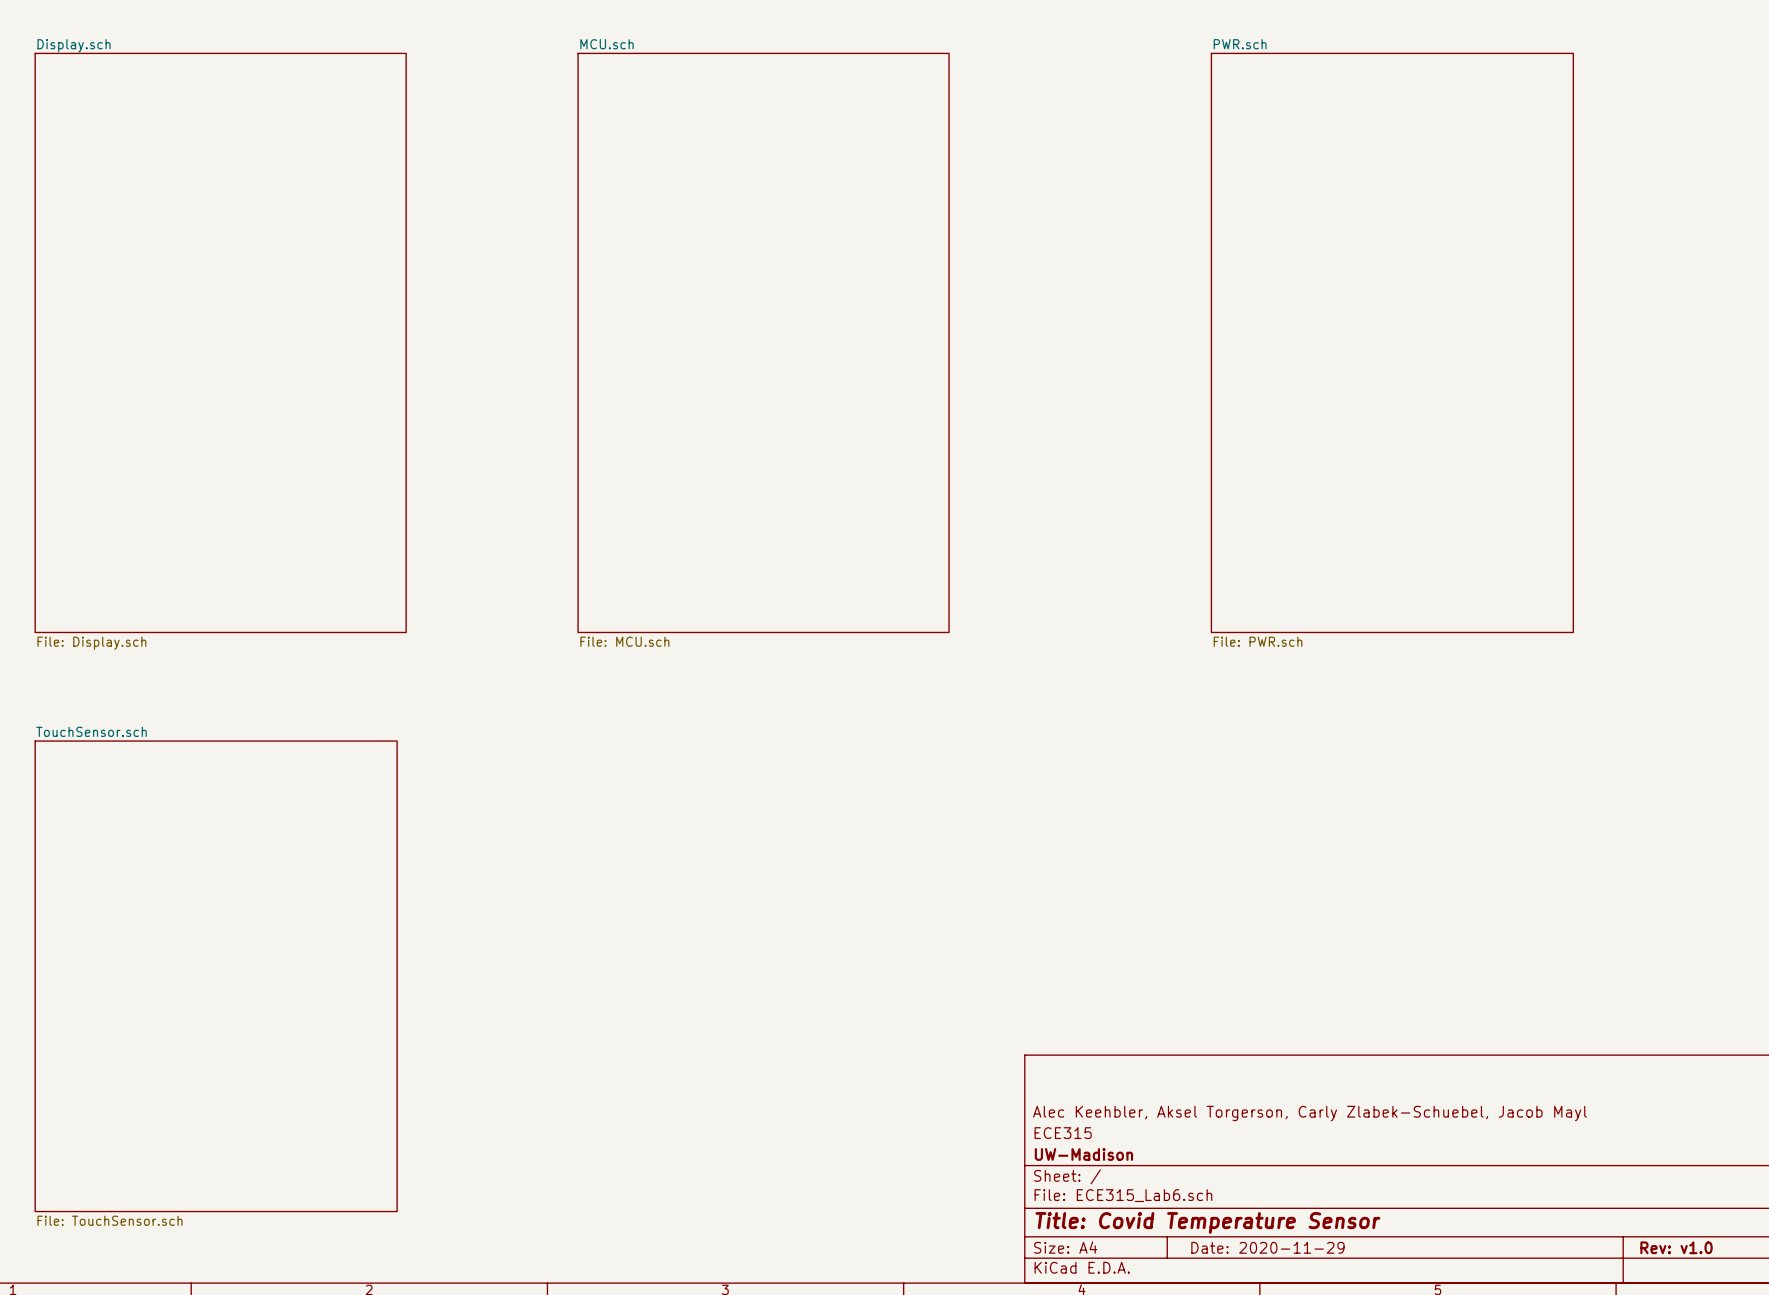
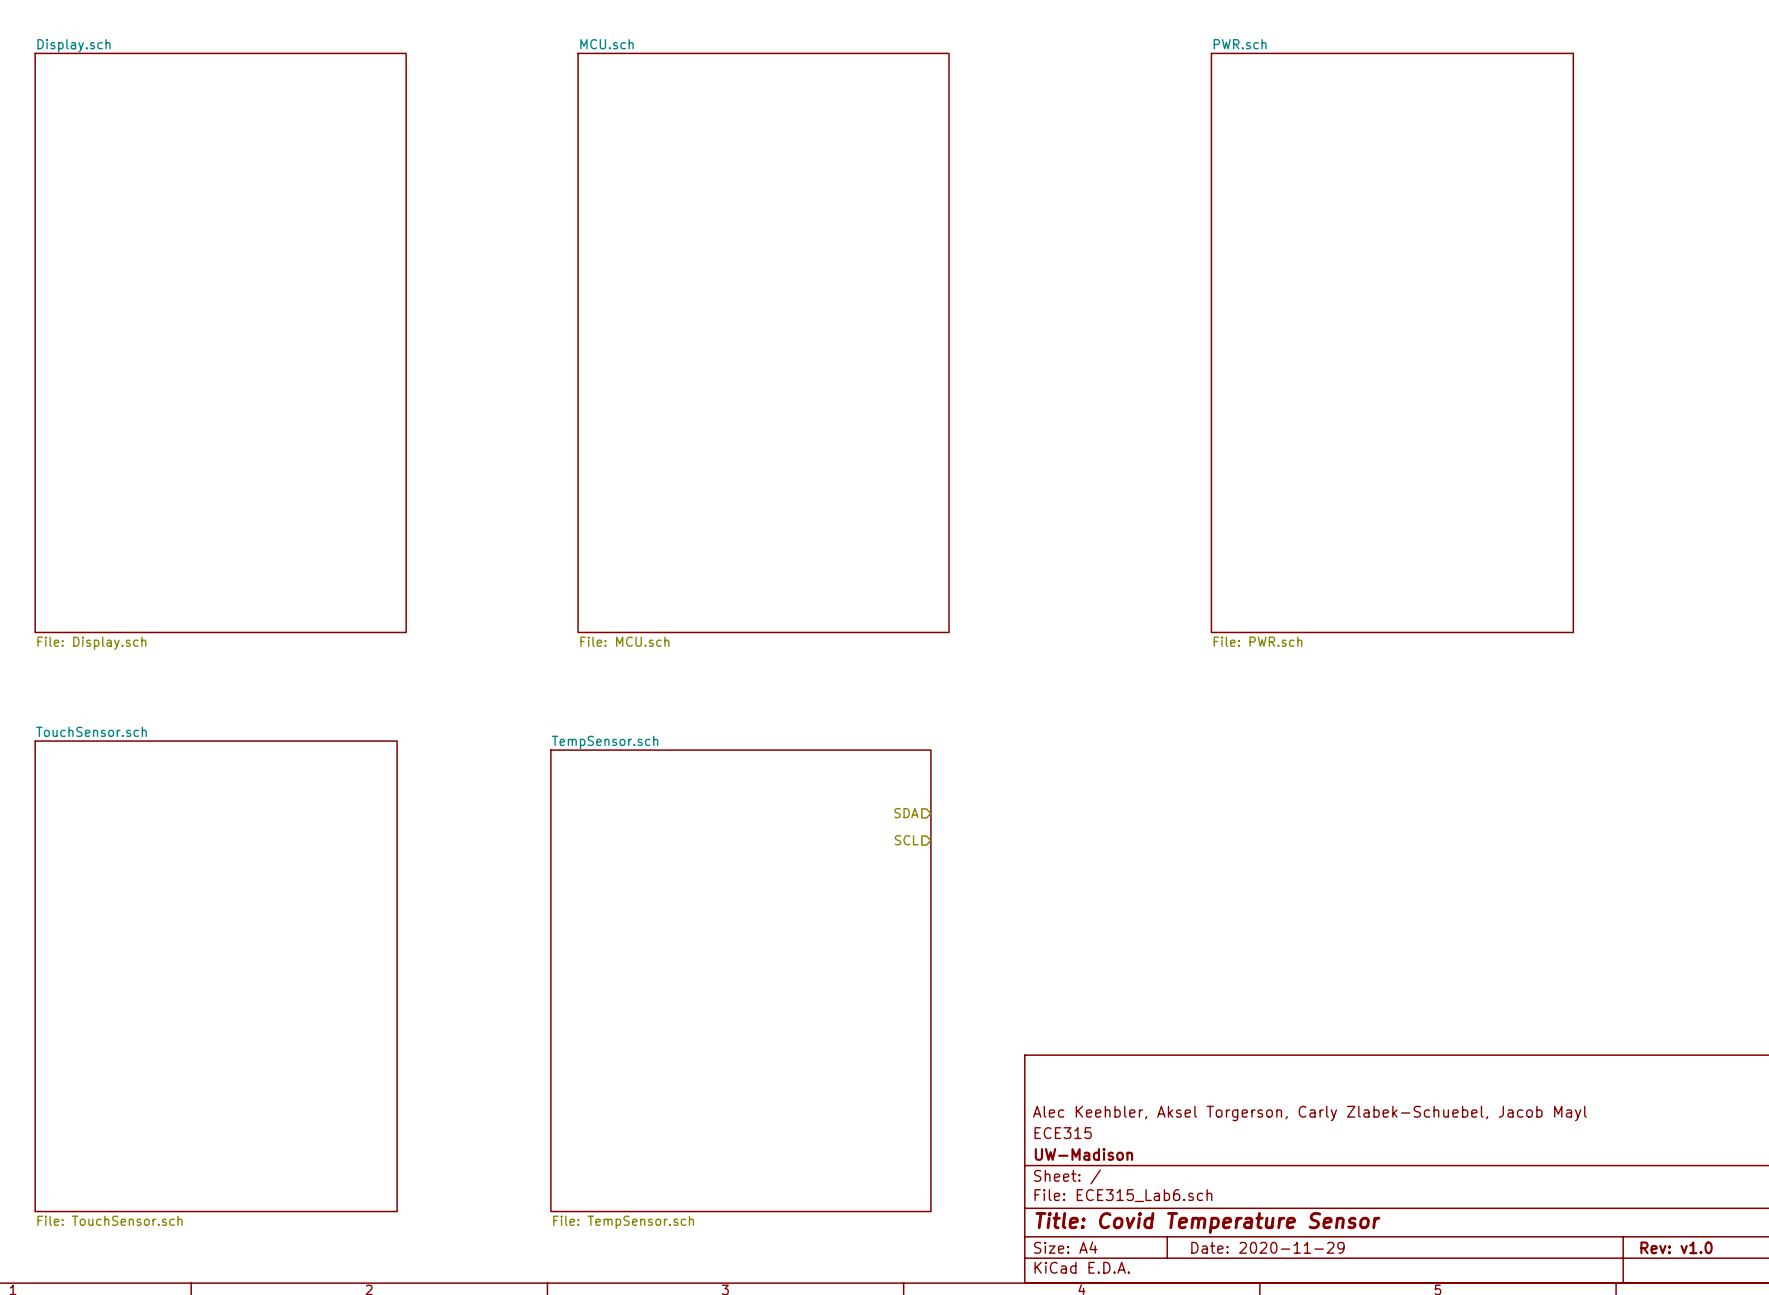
hierarchical label: none -> SDA (906, 813)
hierarchical label: none -> SCL (906, 840)
sheet TempSensor.sch: none -> File: TempSensor.sch (740, 980)

